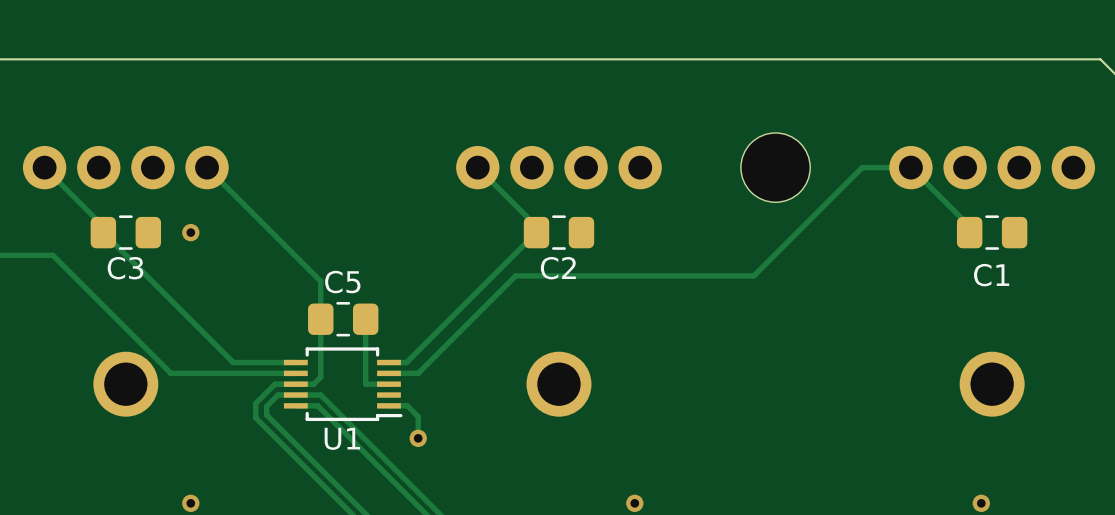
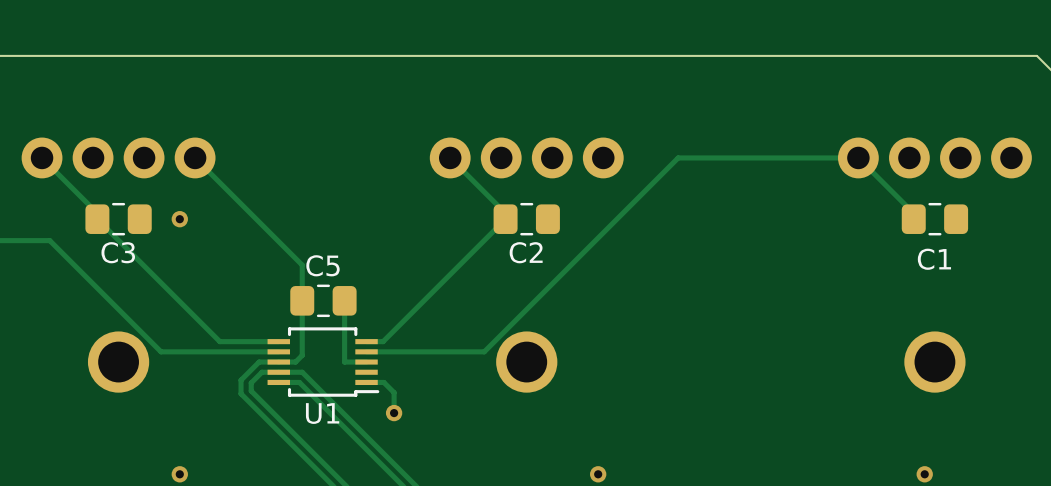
part: (775, 167) -> none
track: (862, 167) (753, 275) (515, 275) (418, 373) -> (812, 157) (678, 157) (484, 351) (394, 351)

